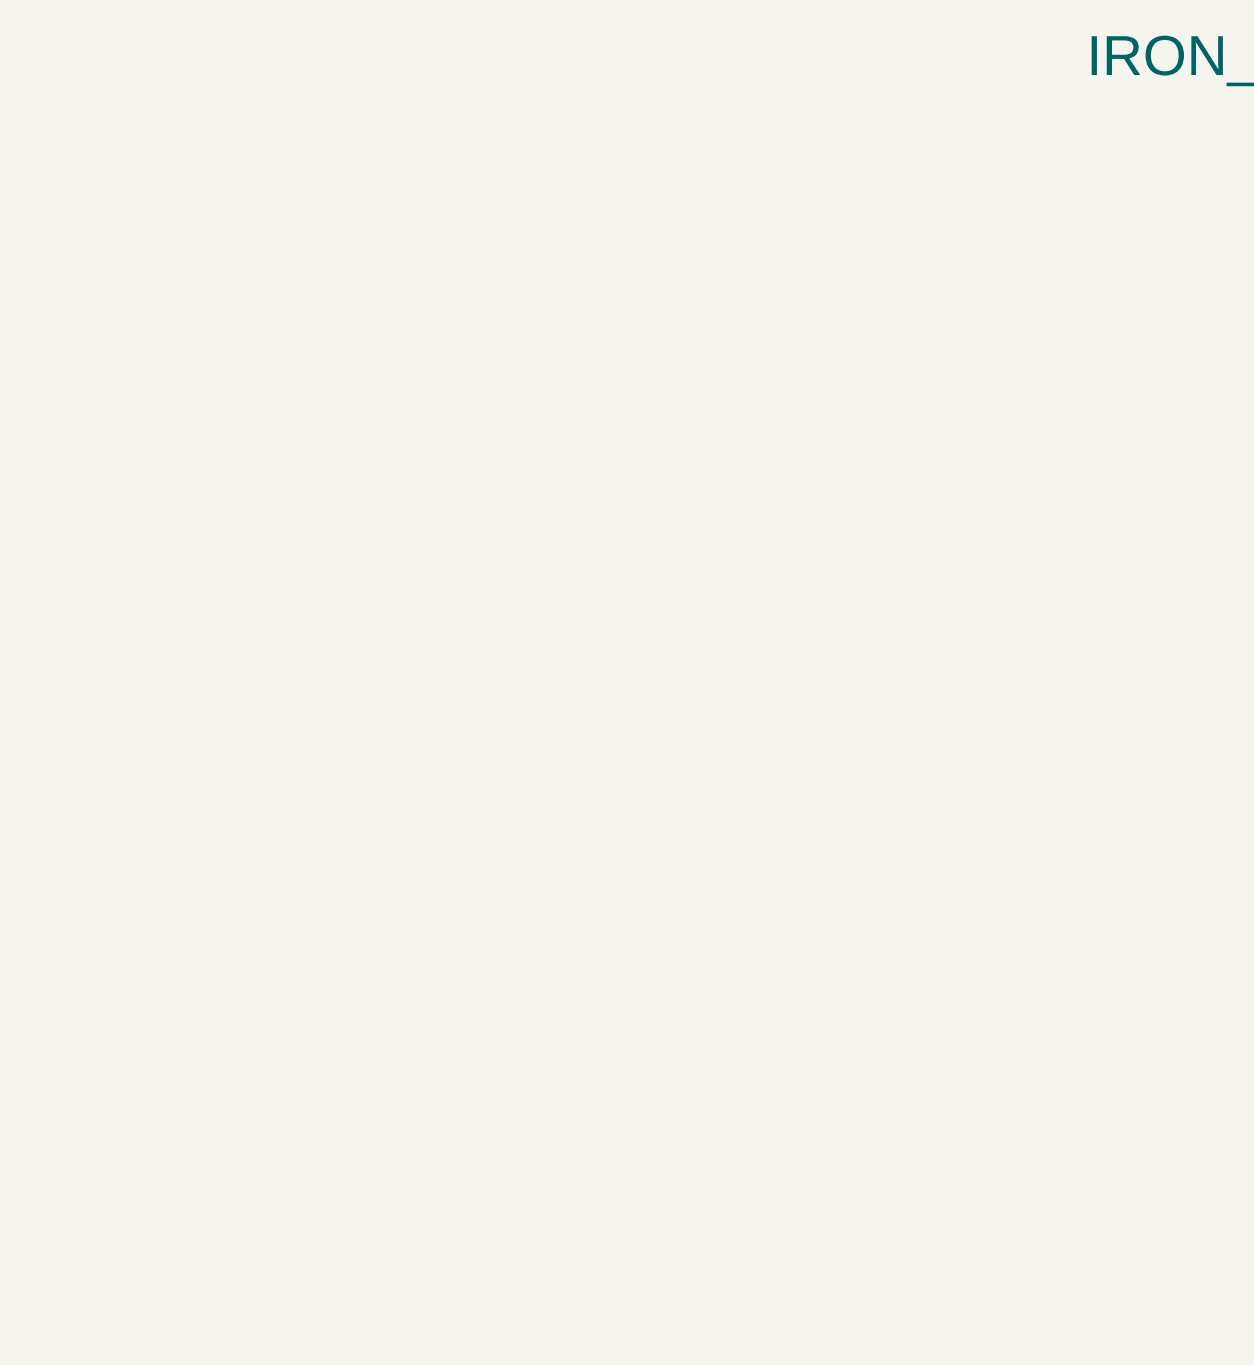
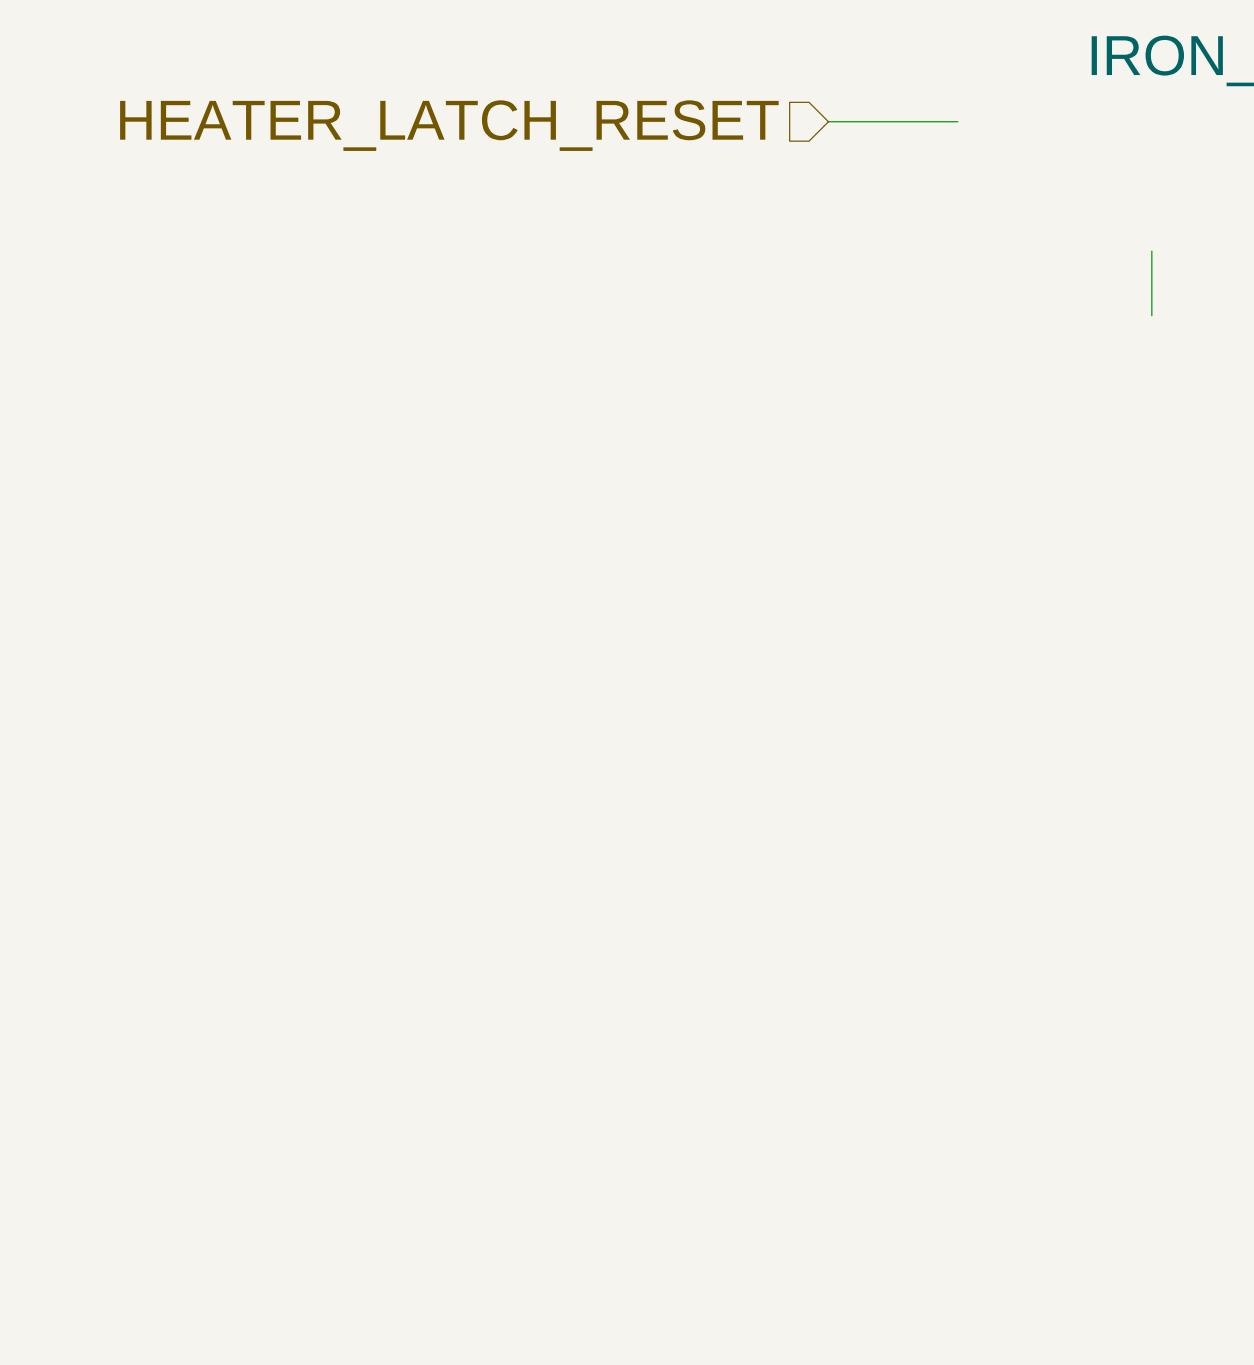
wire: none -> (828, 121) (957, 121)
hierarchical label: none -> HEATER_LATCH_RESET (449, 125)
wire: none -> (1151, 251) (1151, 315)

